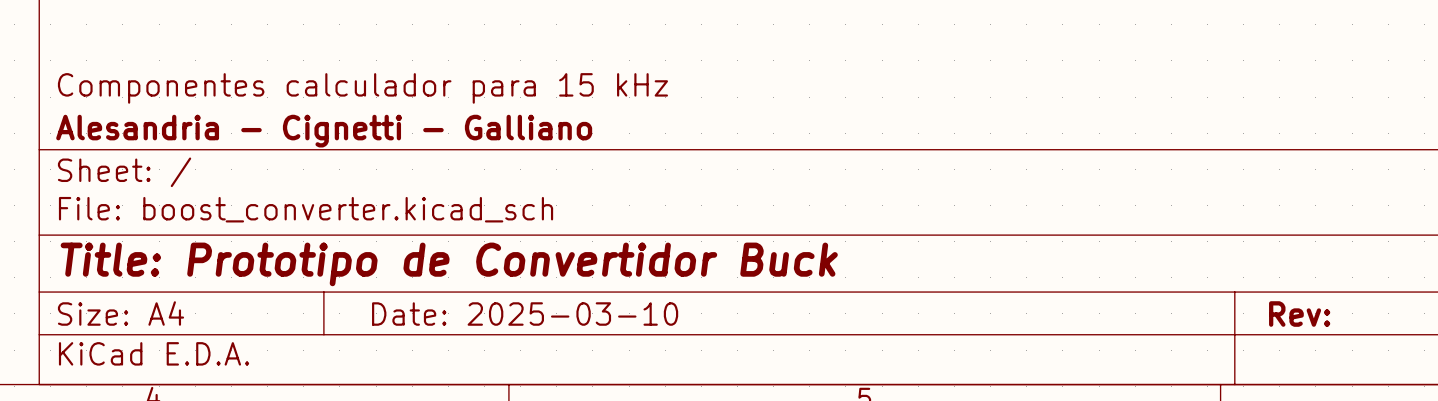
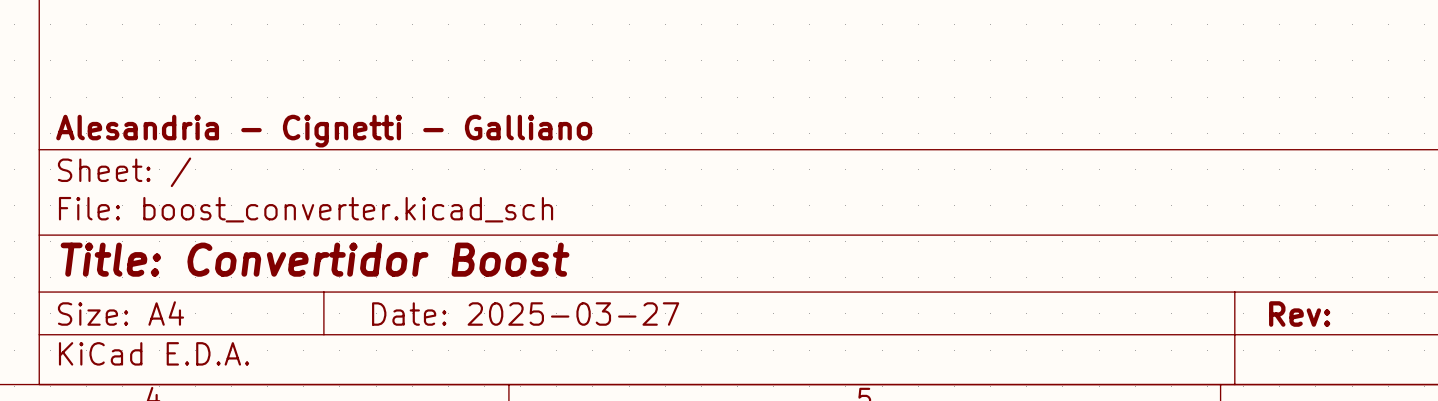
title block: Componentes calculador para 15 kHz (362, 88) -> none
title block: Title: Prototipo de Convertidor Buck (449, 264) -> Title: Convertidor Boost (315, 259)
title block: Date: 2025-03-10 (525, 314) -> Date: 2025-03-27 (525, 314)

